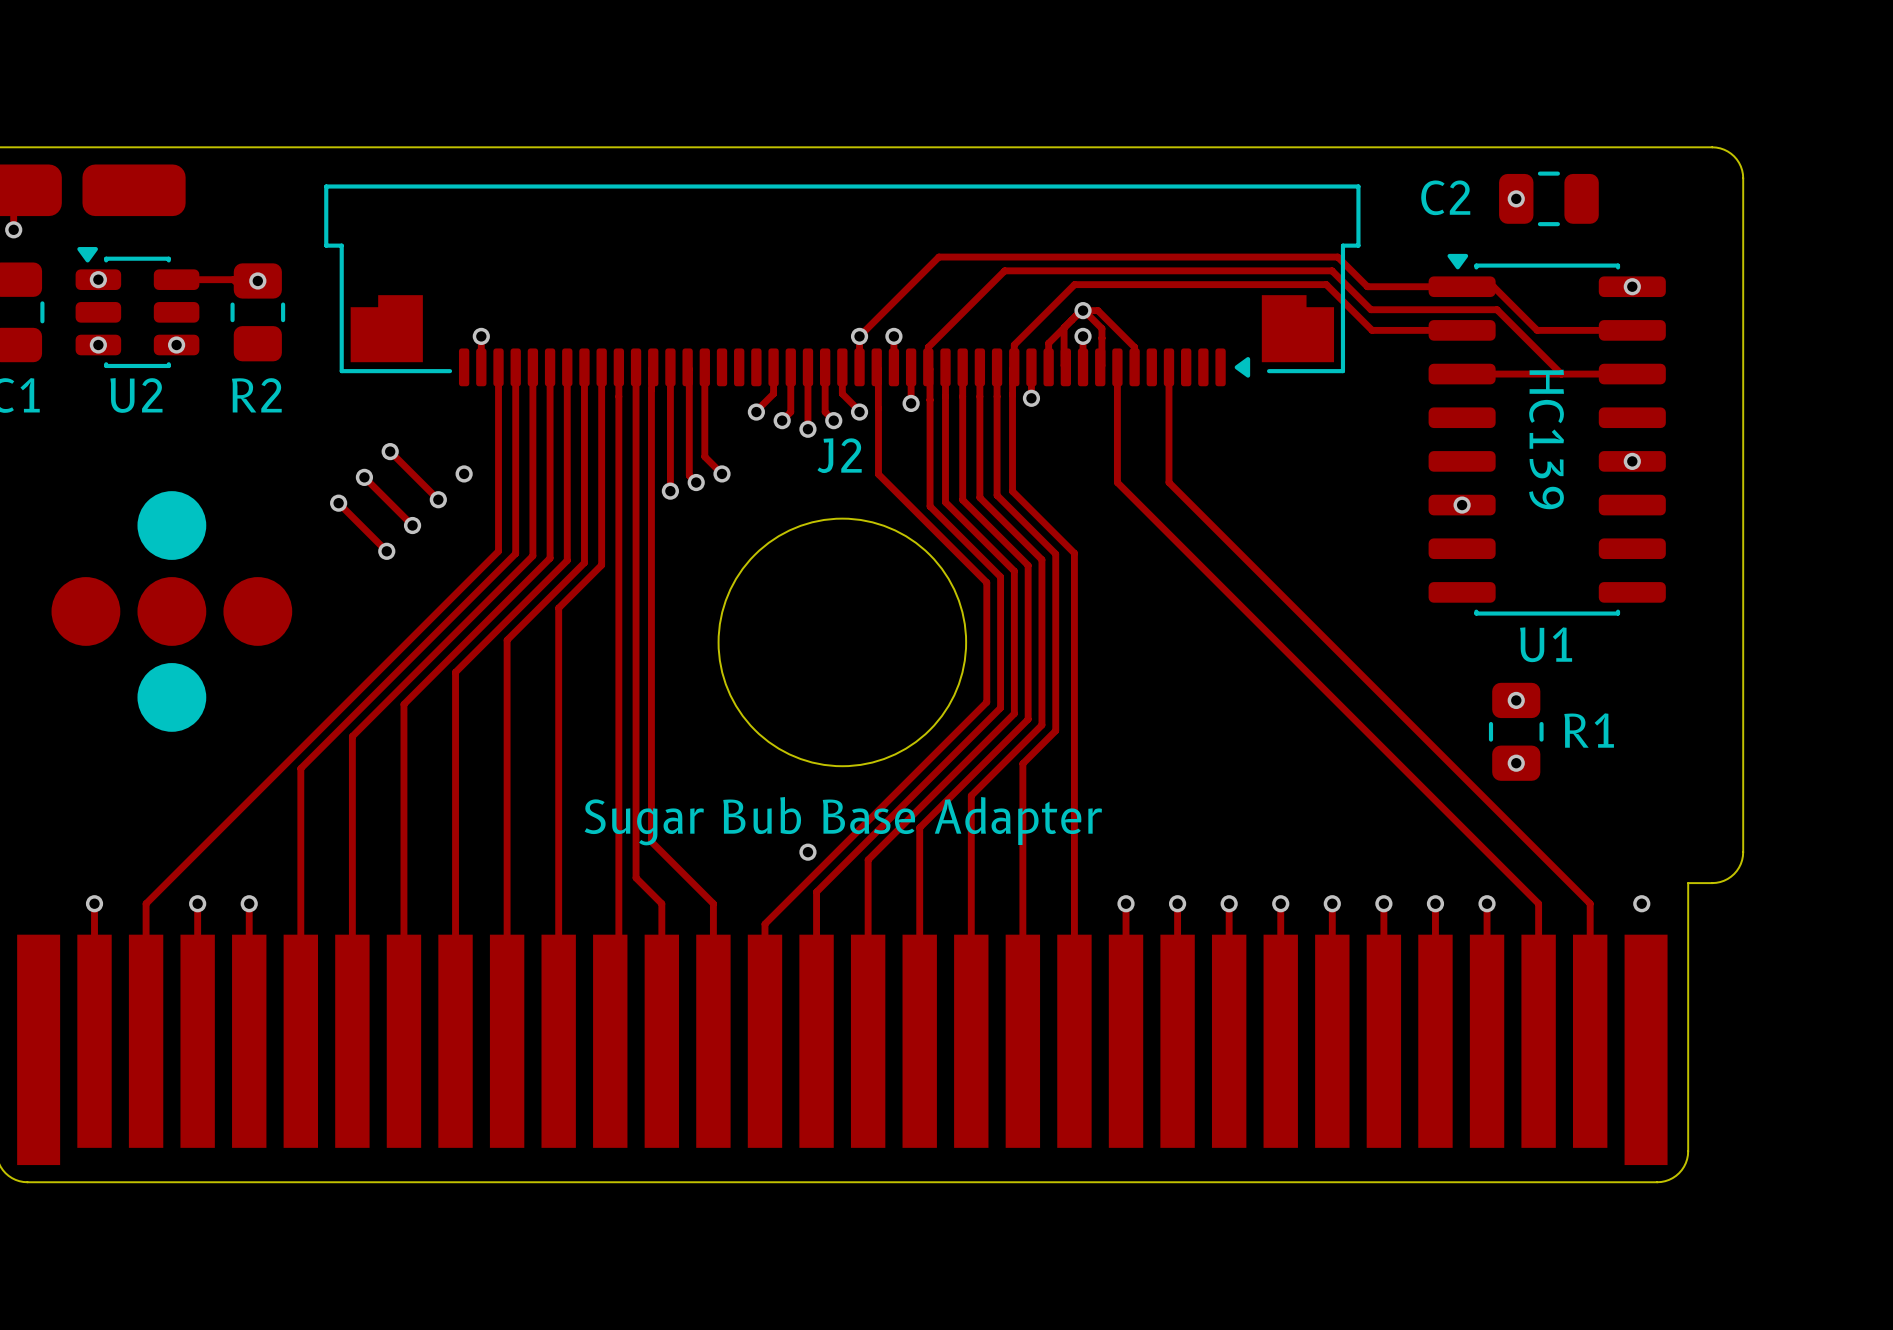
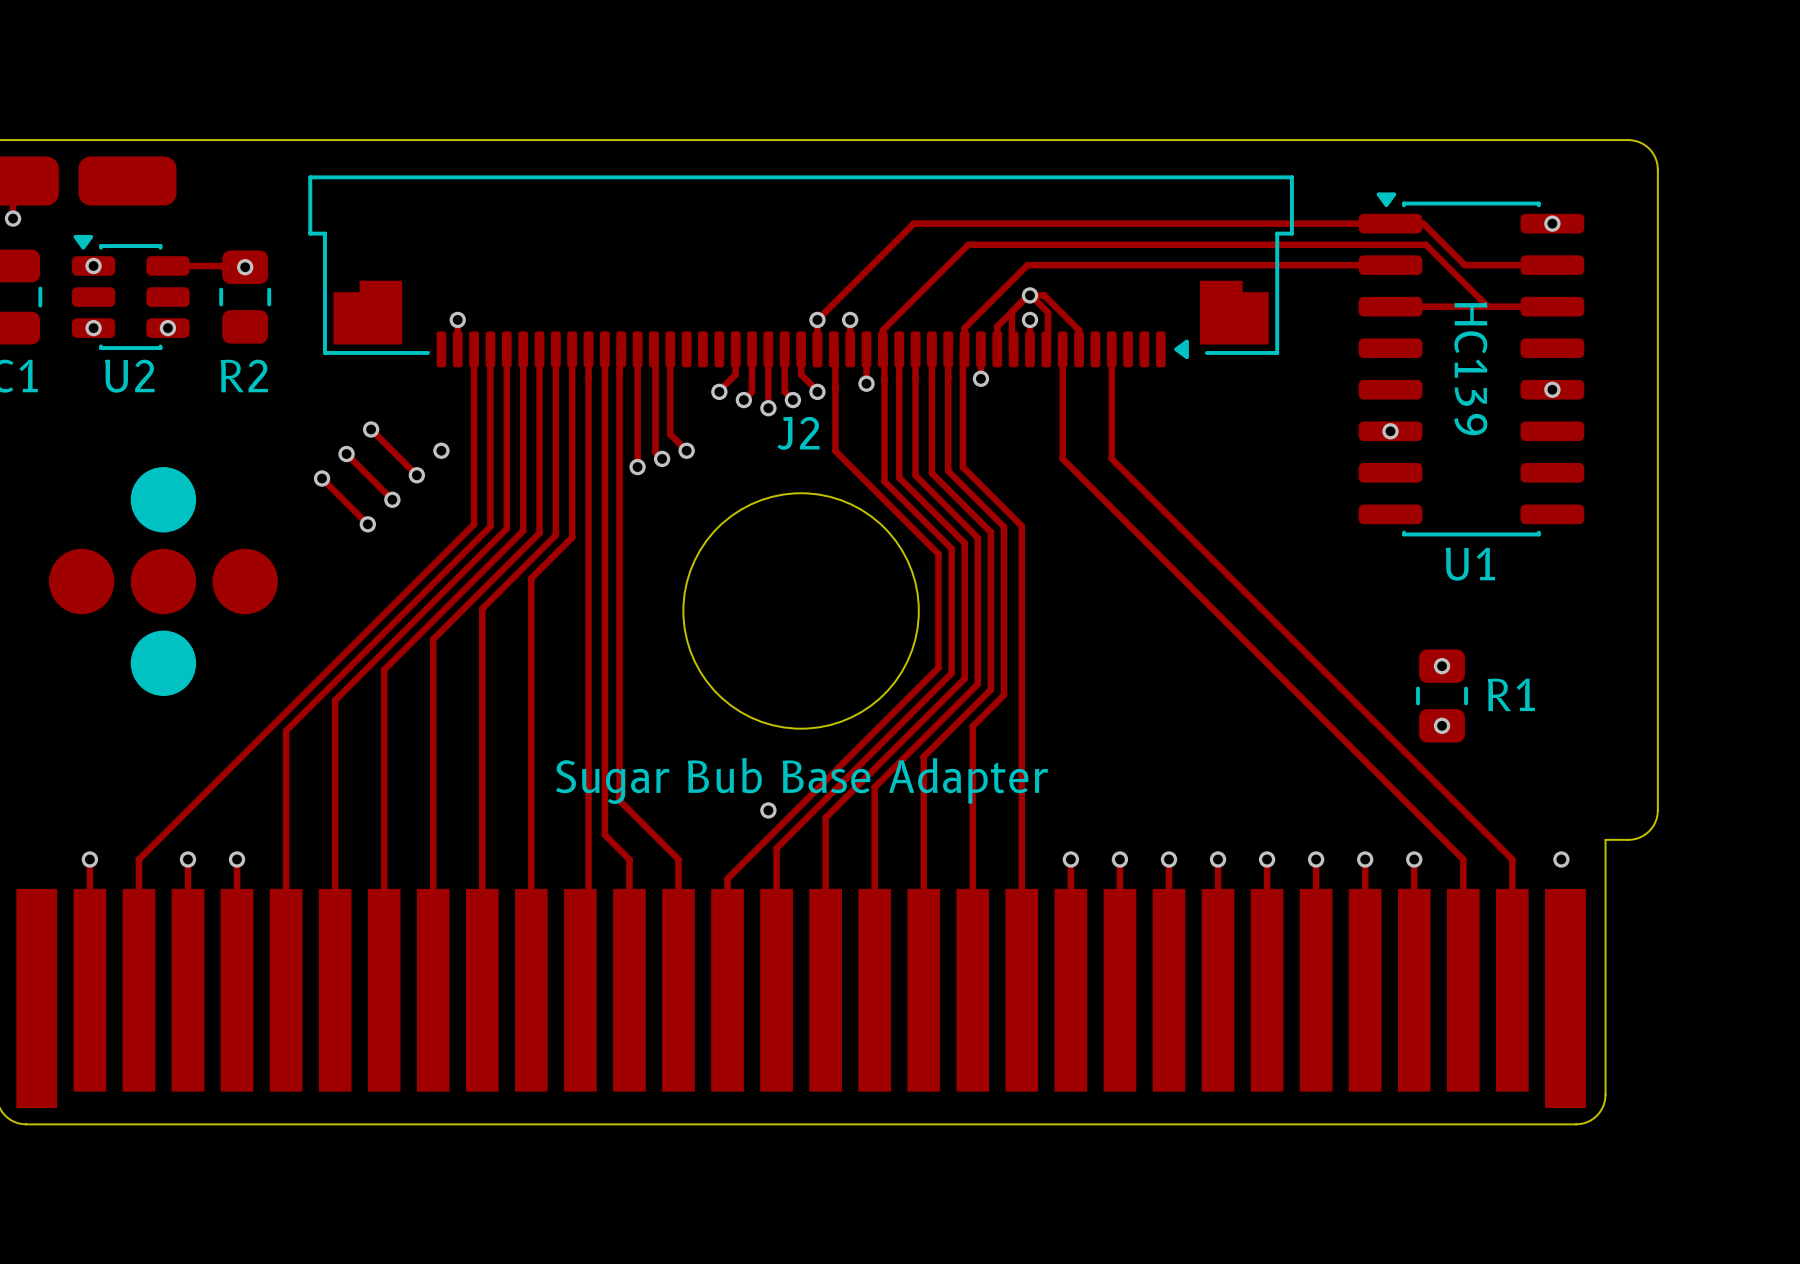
via: (1516, 198) -> none
C2: (1548, 198) -> none
track: (938, 257) (1337, 257) (1367, 286) (1493, 286) (1537, 330) (1632, 330) -> (892, 244) (913, 223) (1423, 223) (1464, 265) (1552, 265)
track: (1004, 270) (1332, 270) (1370, 309) (1497, 309) (1561, 374) -> (955, 257) (968, 244) (1425, 244) (1487, 306)
track: (1074, 284) (1326, 284) (1372, 330) (1462, 330) -> (1021, 270) (1027, 265) (1390, 265)
via position: (1632, 286) -> (1552, 223)
track: (1462, 374) (1632, 374) -> (1390, 306) (1552, 306)
U1 position: (1547, 434) -> (1471, 364)
via position: (1632, 461) -> (1552, 389)
via position: (1462, 505) -> (1390, 431)

